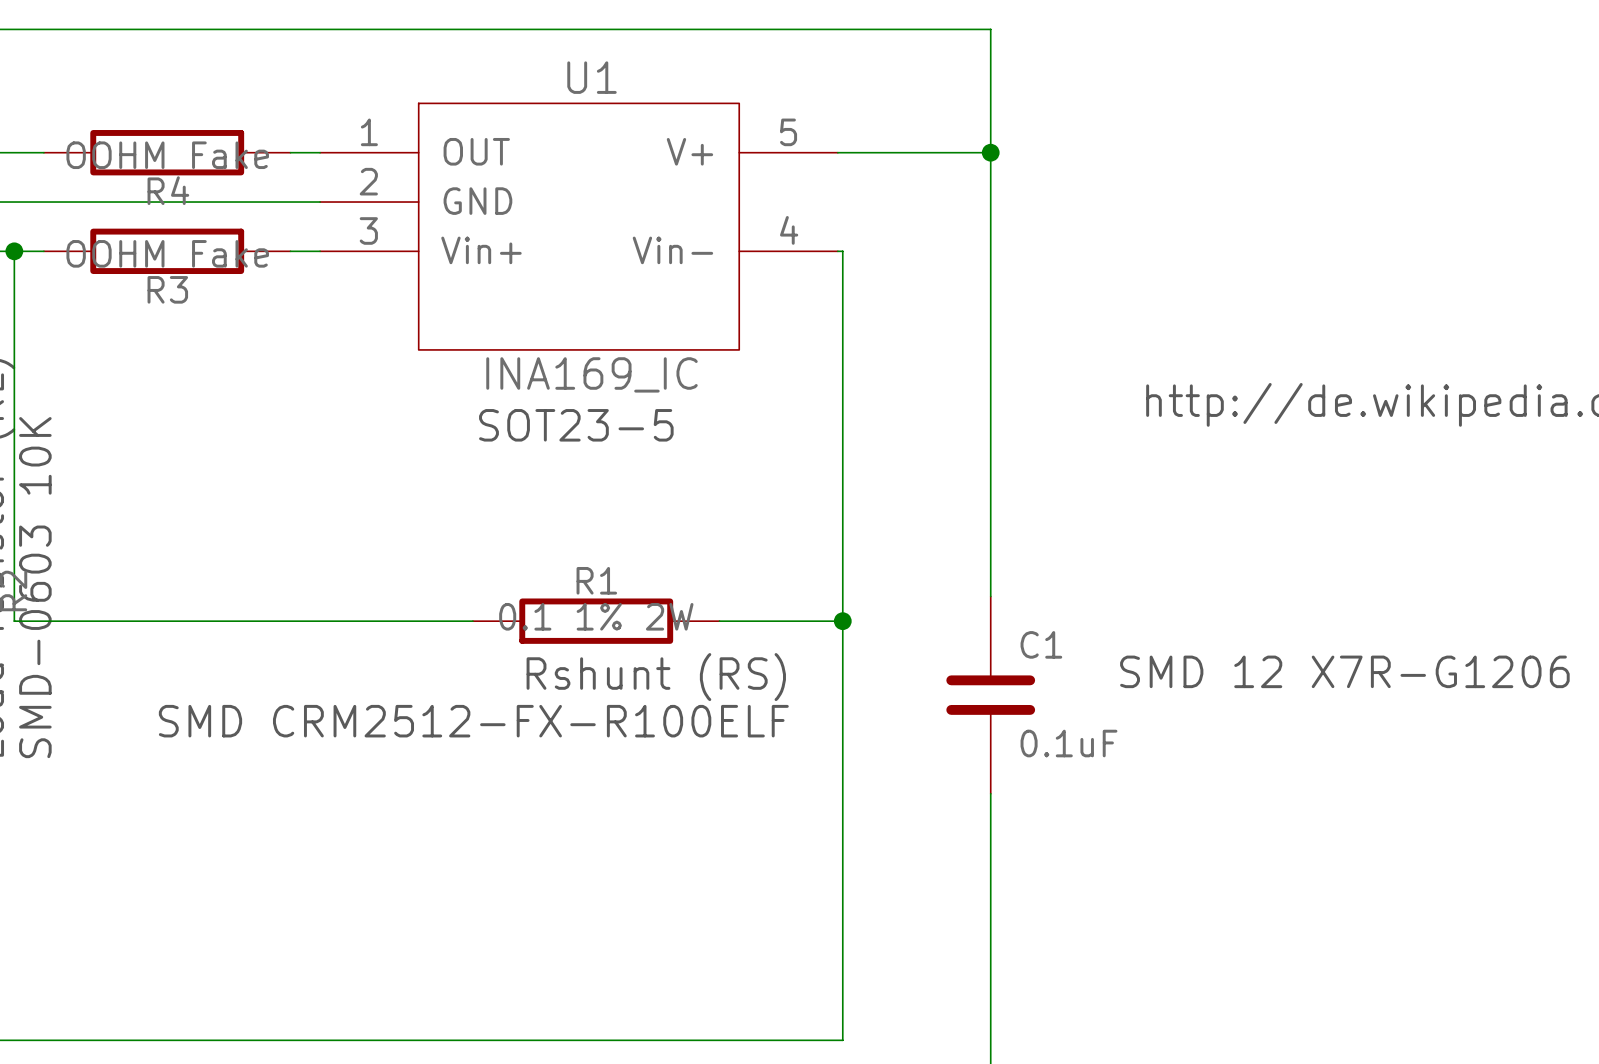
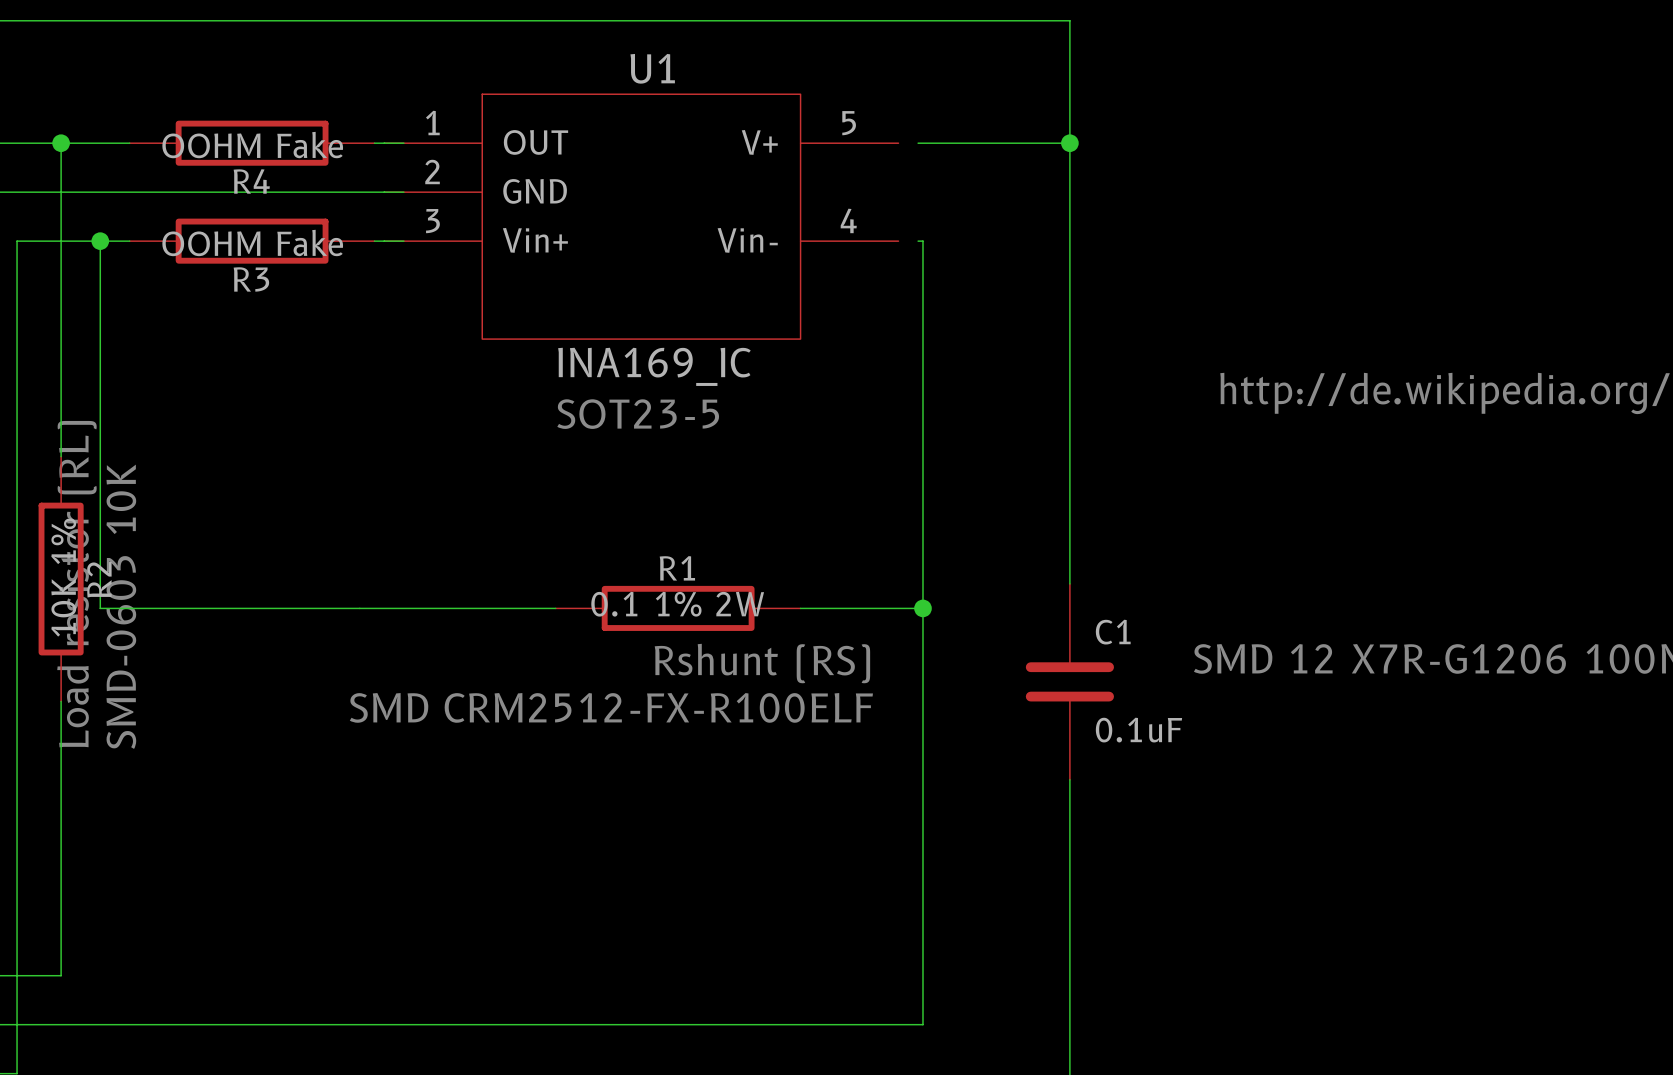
U1 position: (578, 226) -> (641, 216)

